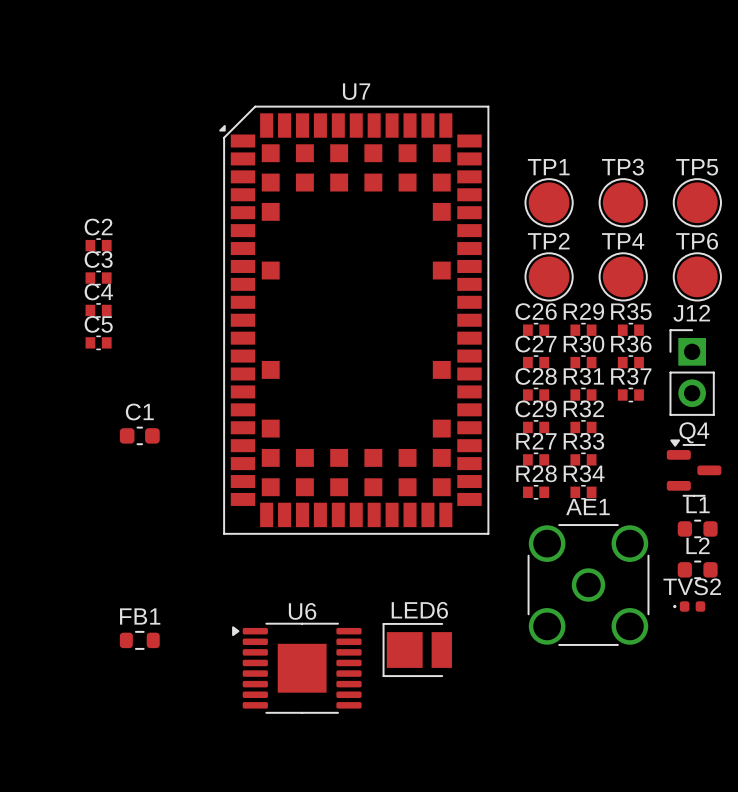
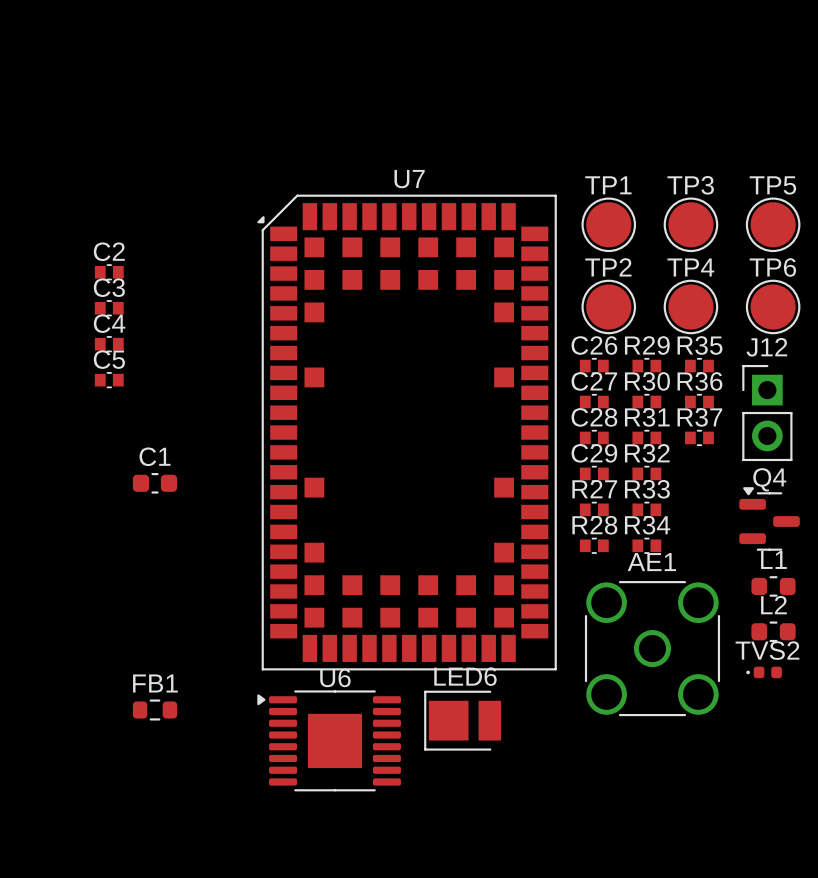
U7 position: (354, 320) -> (407, 432)

